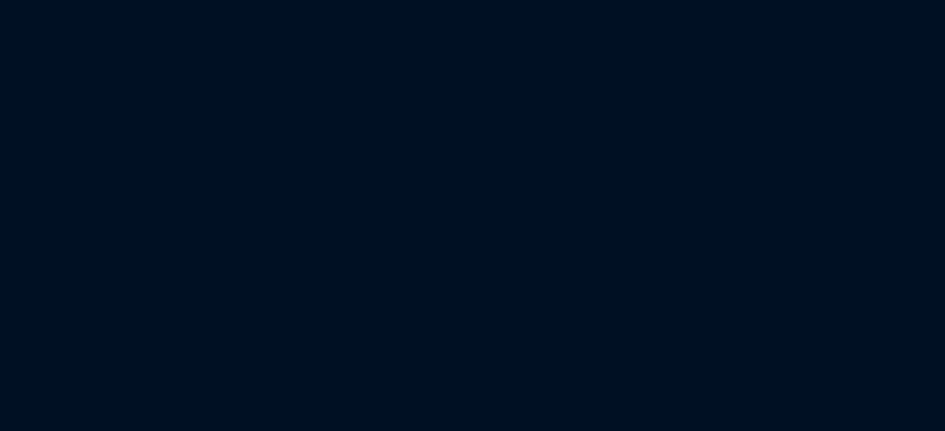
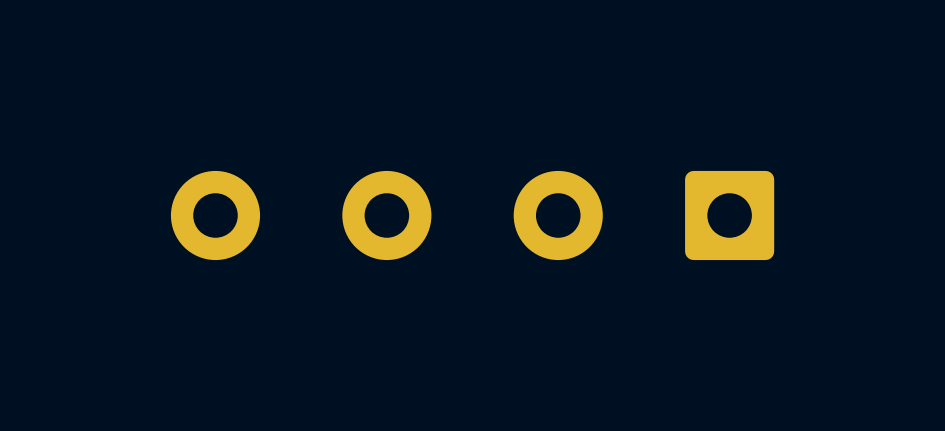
part: none -> (472, 215)

